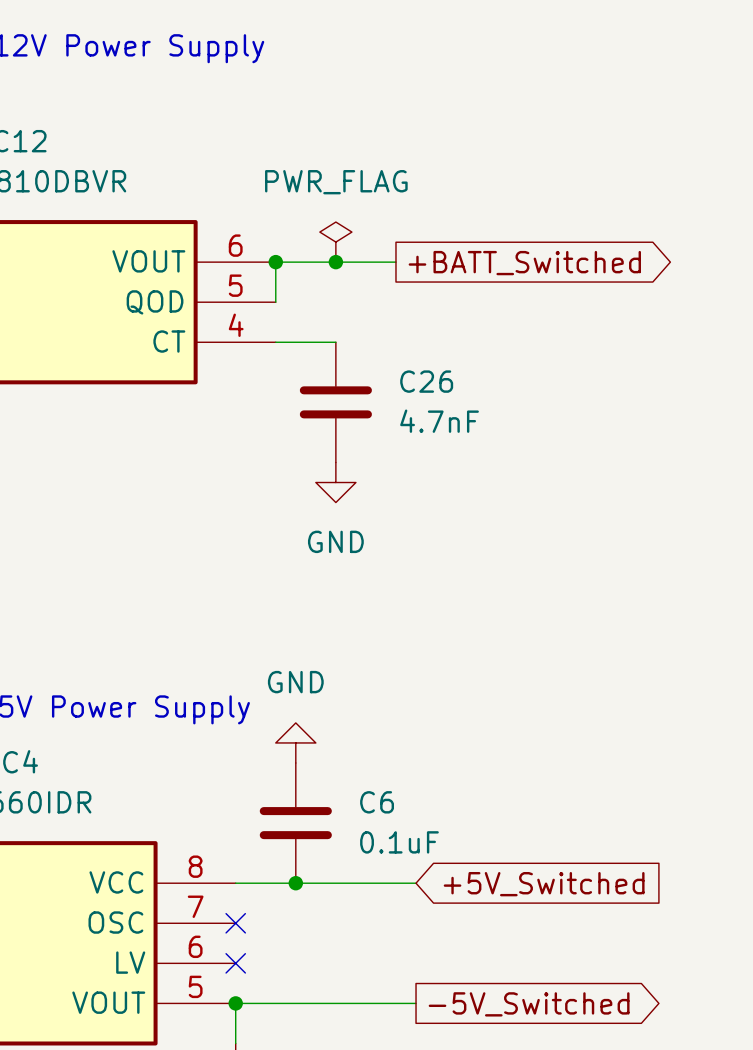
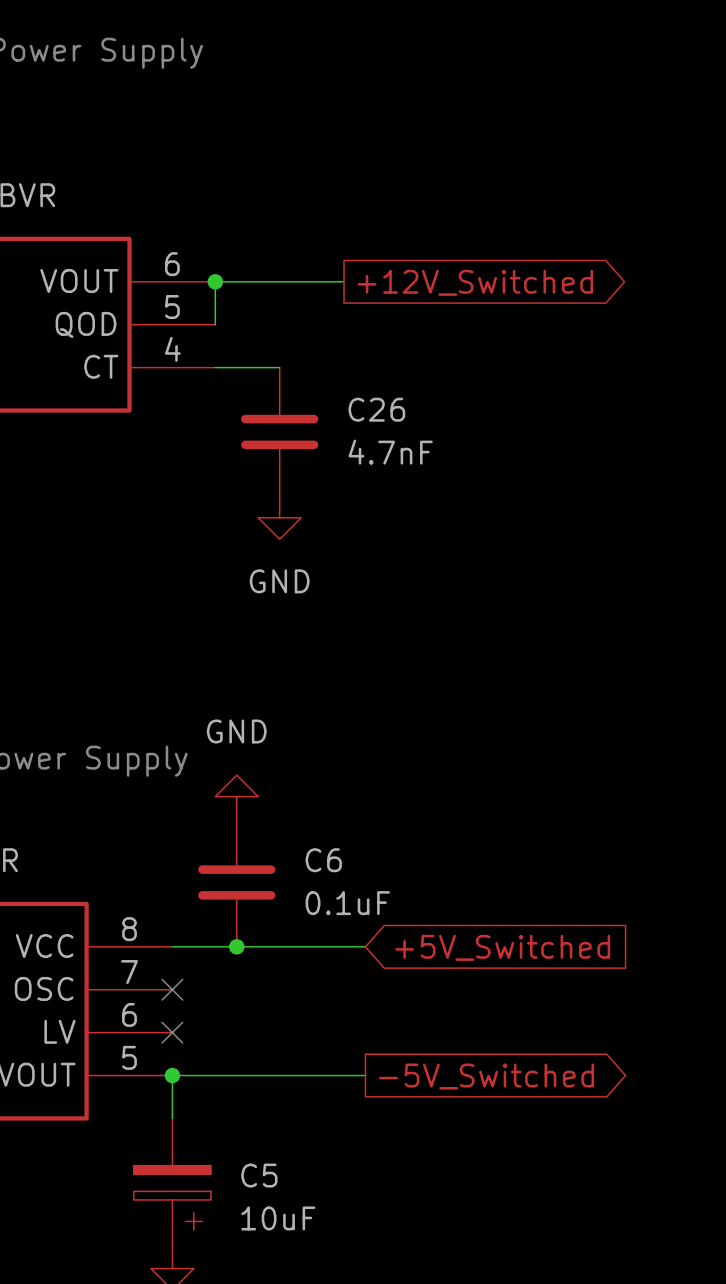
power symbol: PWR_FLAG (335, 242) -> none
junction: (335, 262) -> none
global label: +BATT_Switched (524, 263) -> +12V_Switched (475, 282)

